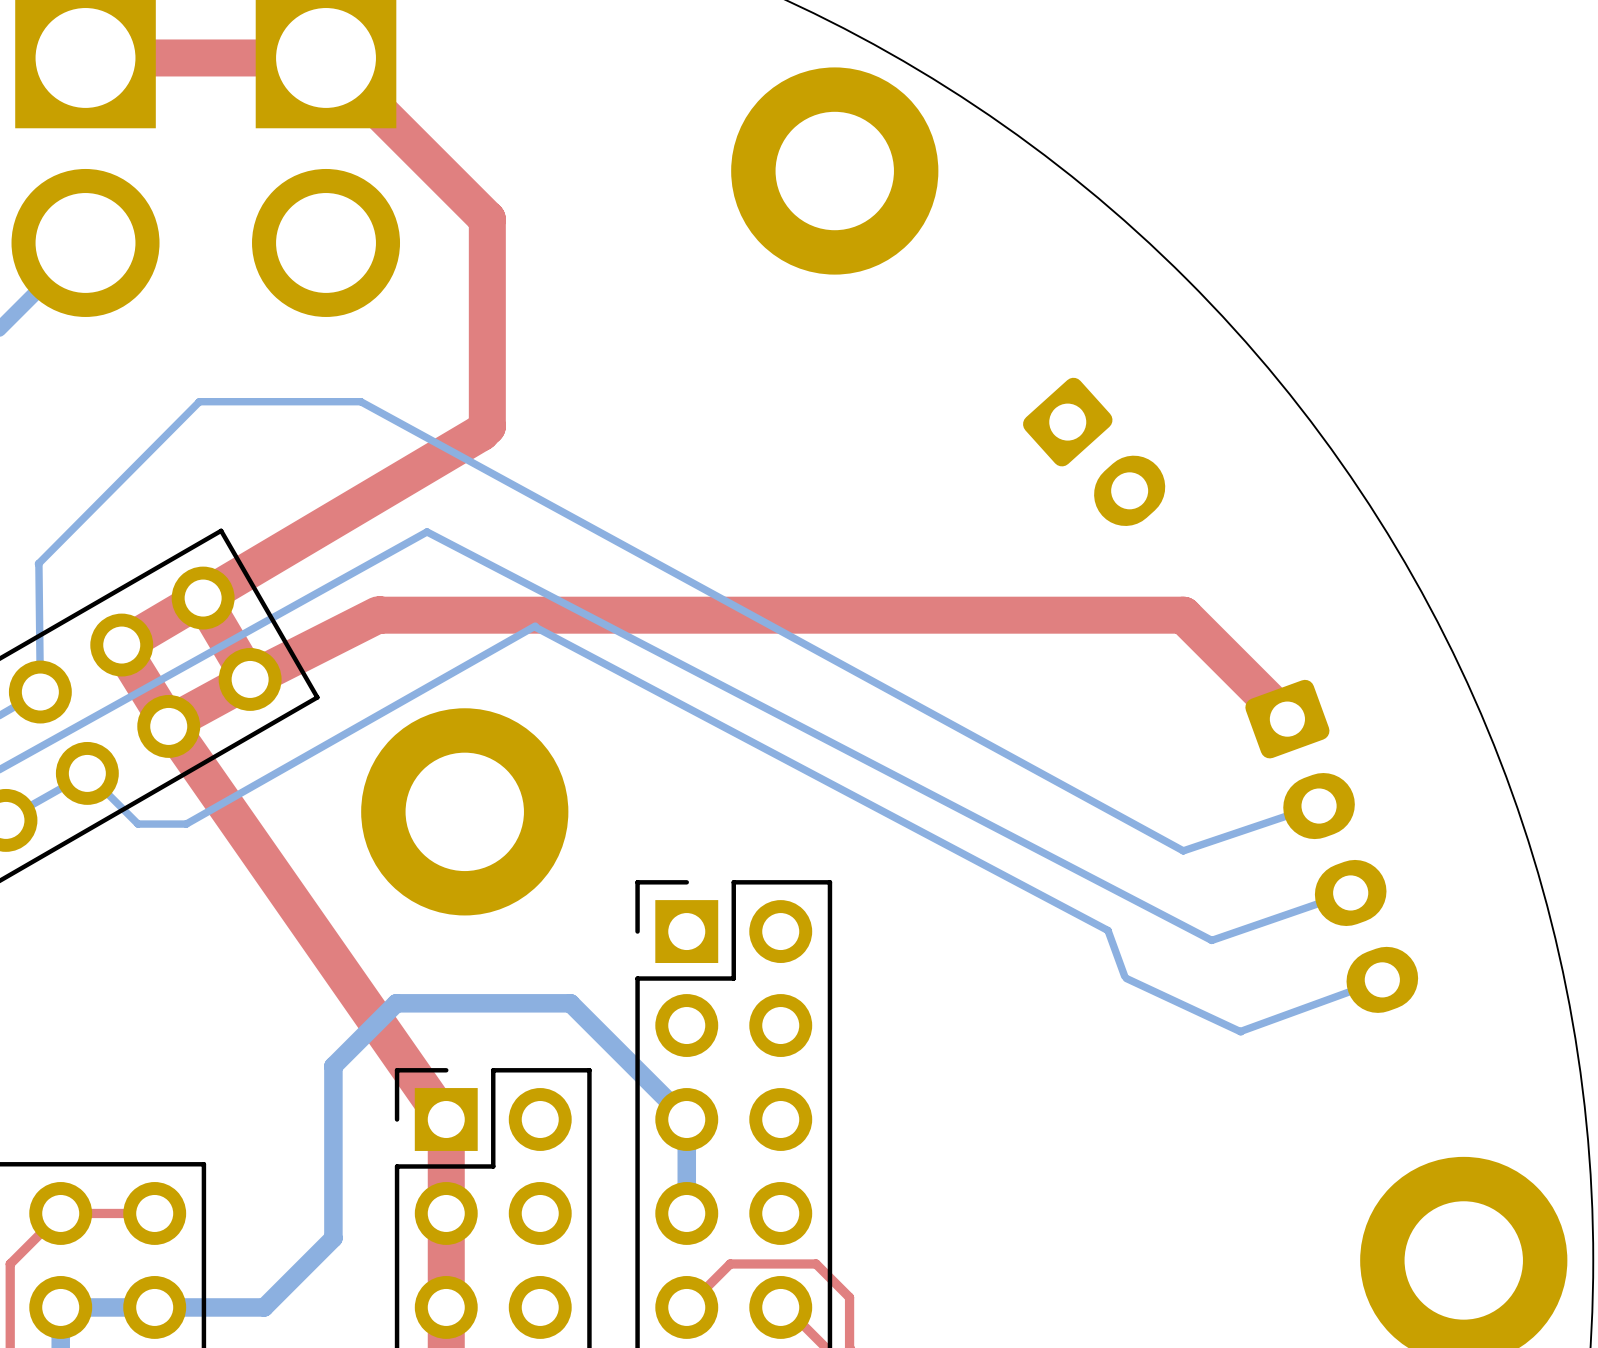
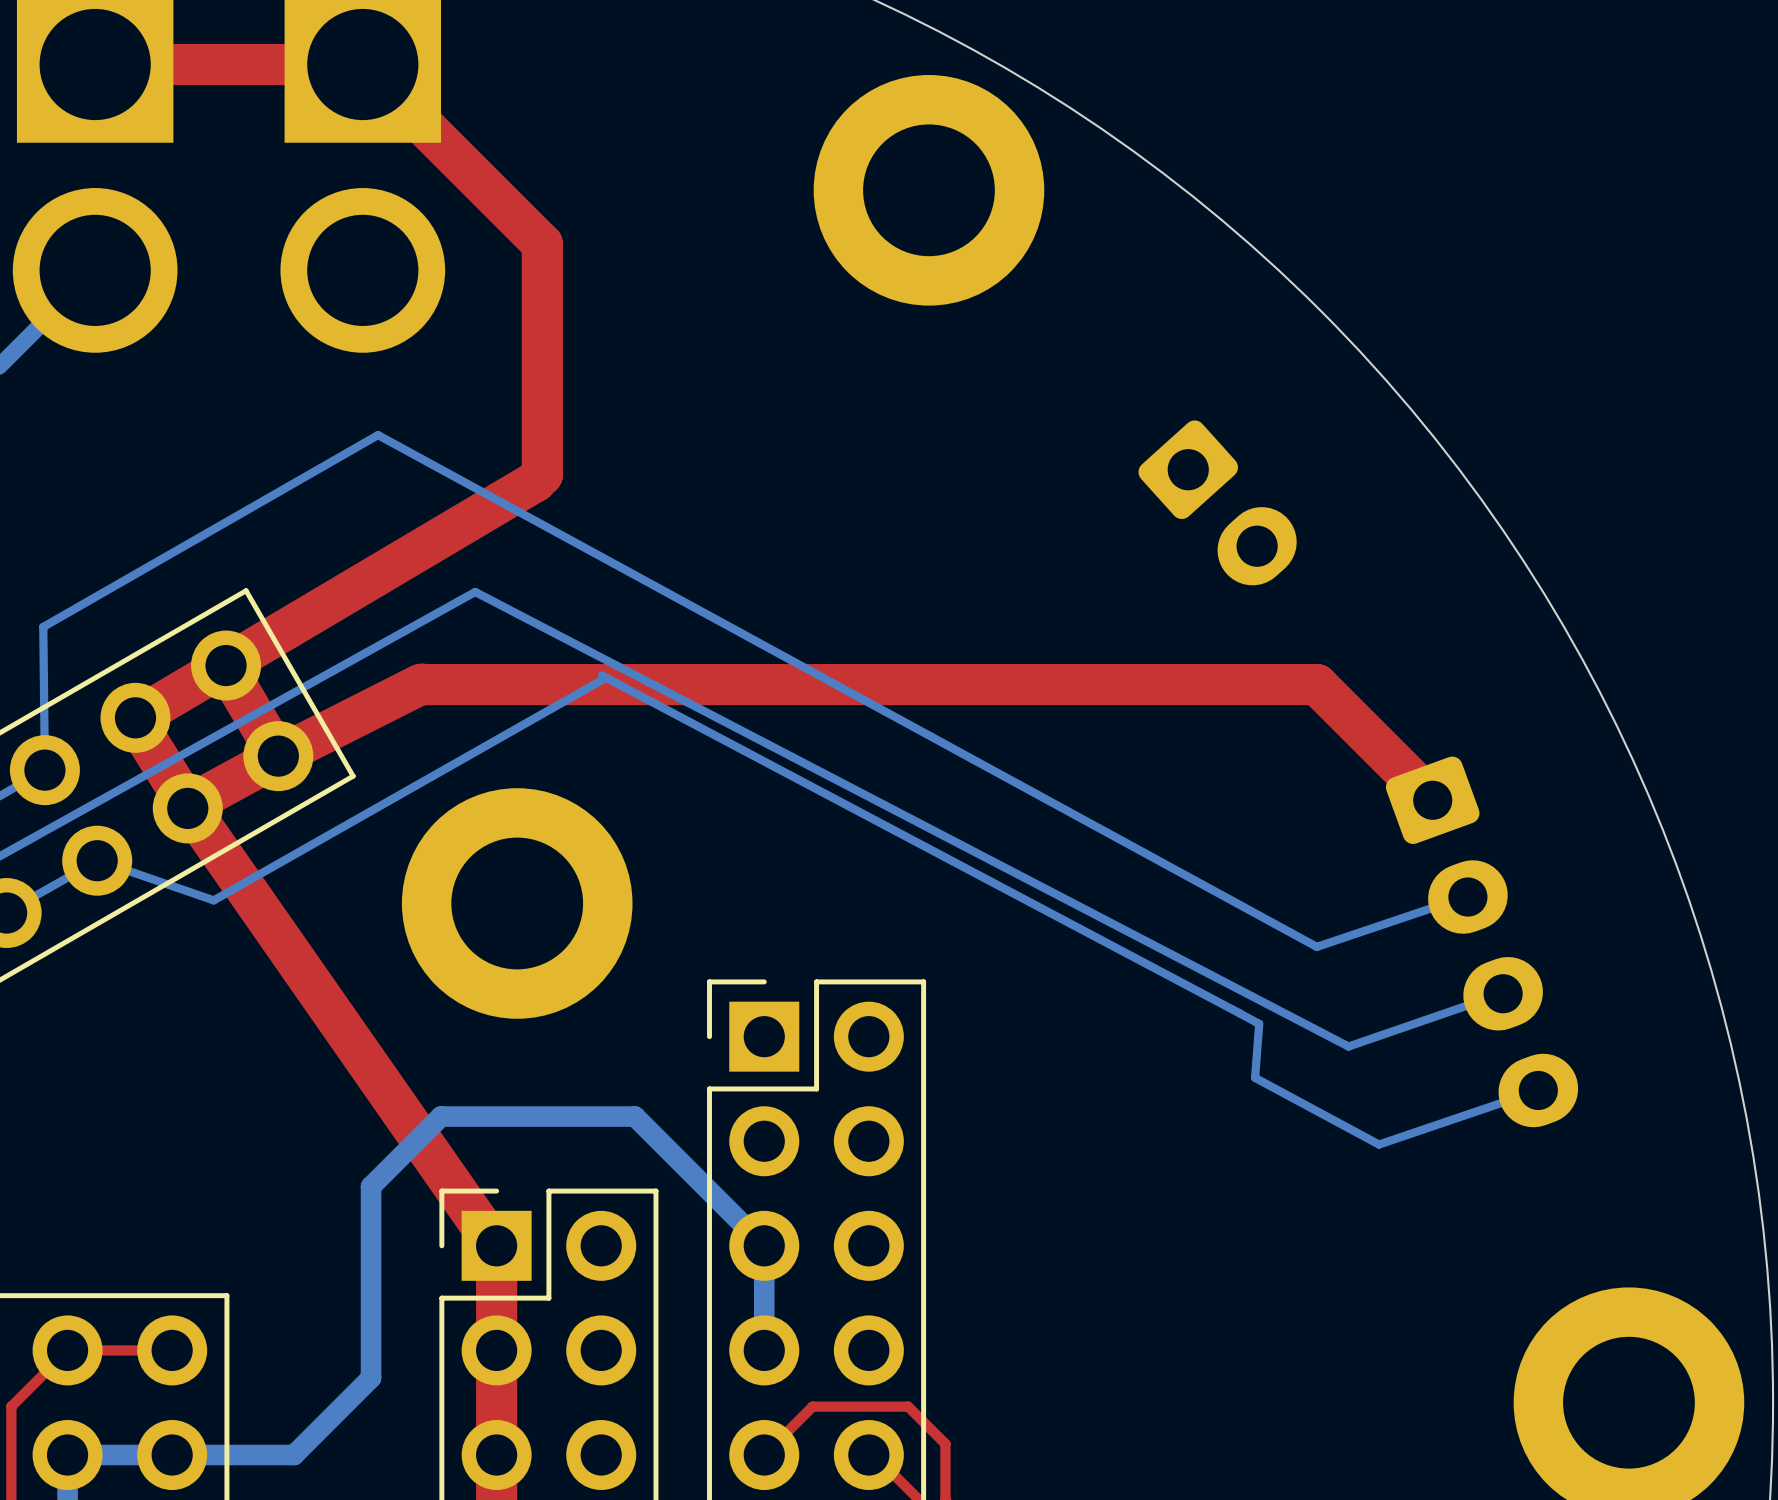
bottom track: (38, 563) (199, 401) (360, 401) (1183, 850) -> (43, 626) (378, 435) (1316, 946)
bottom track: (535, 626) (186, 824) (137, 824) (87, 773) -> (602, 680) (213, 900) (98, 860)
bottom track: (535, 627) (1108, 930) (1124, 976) -> none
bottom track: (1126, 978) (1240, 1031) -> none
bottom track: (1381, 980) (1240, 1031) -> (1537, 1090) (1379, 1144) (1255, 1077) (1259, 1023) (602, 675)

